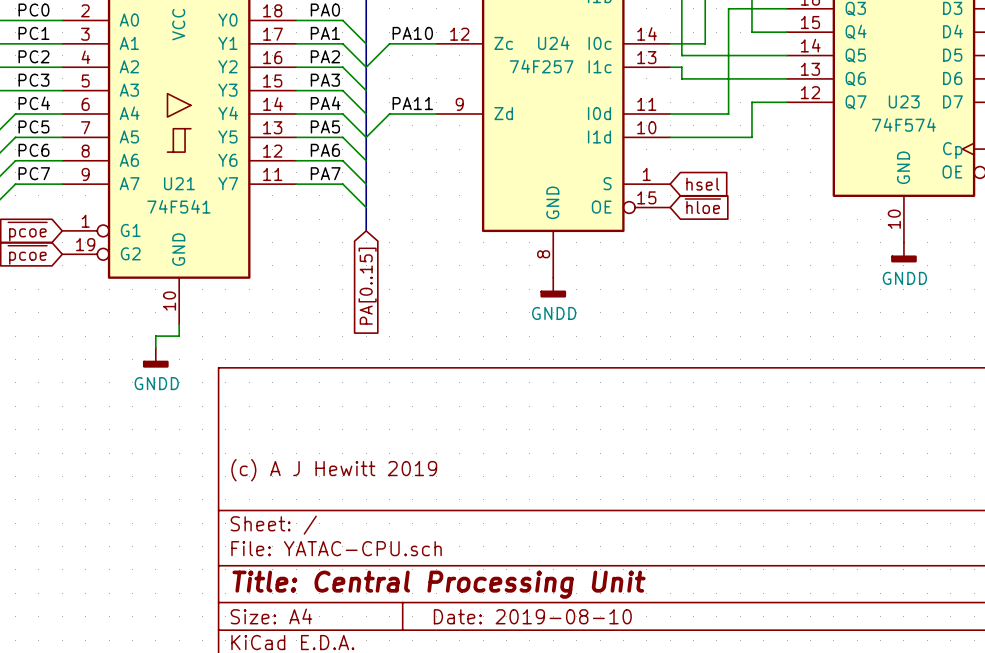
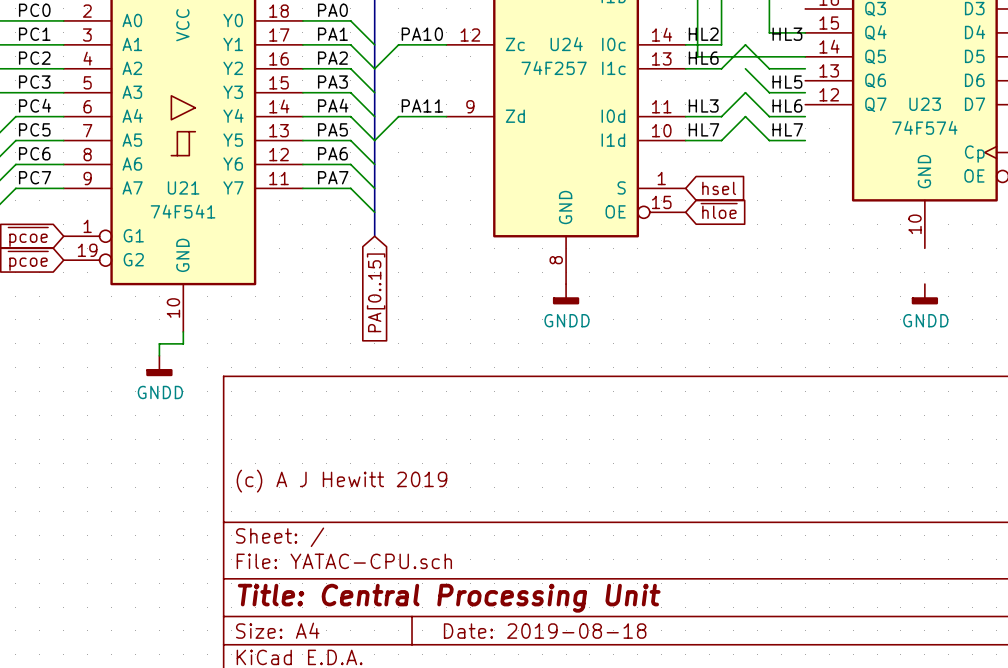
wire: (787, 8) (728, 8) (728, 114) (705, 114) -> (805, 116) (769, 116) (745, 92) (721, 116)
label: none -> HL2 (703, 34)
label: none -> HL3 (787, 34)
label: none -> HL6 (703, 58)
wire: (681, 67) (681, 78) (787, 78) -> (697, 68) (721, 68) (745, 44) (769, 68) (805, 68)
wire: none -> (745, 68) (769, 92) (805, 92)
label: none -> HL5 (787, 82)
wire: (787, 102) (751, 102) (751, 137) (705, 137) -> (805, 140) (769, 140) (745, 116) (721, 140)
label: none -> HL3 (703, 105)
label: none -> HL6 (787, 105)
label: none -> HL7 (703, 129)
label: none -> HL7 (787, 129)
power symbol position: GNDD (903, 252) -> GNDD (924, 294)
title block: Date: 2019-08-10 (532, 616) -> Date: 2019-08-18 (545, 631)

